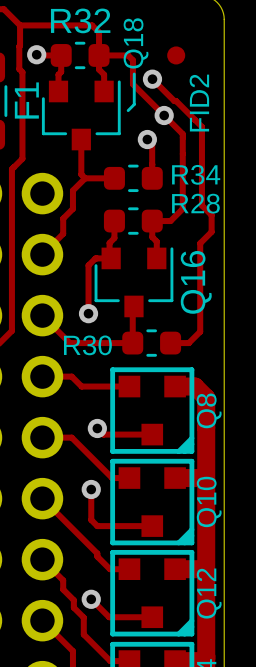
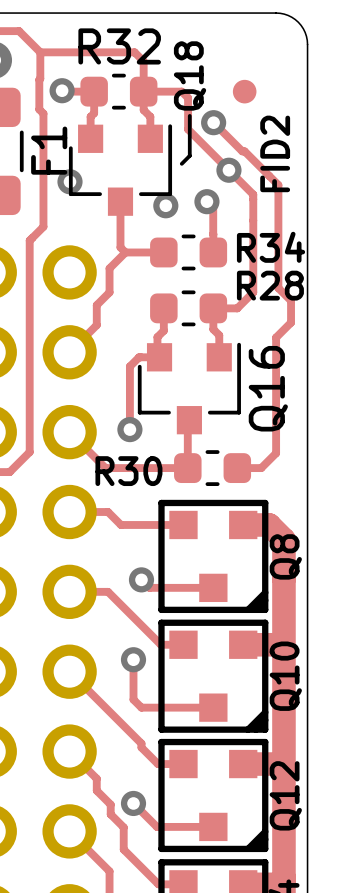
via: none -> (70, 181)
via: none -> (165, 205)

